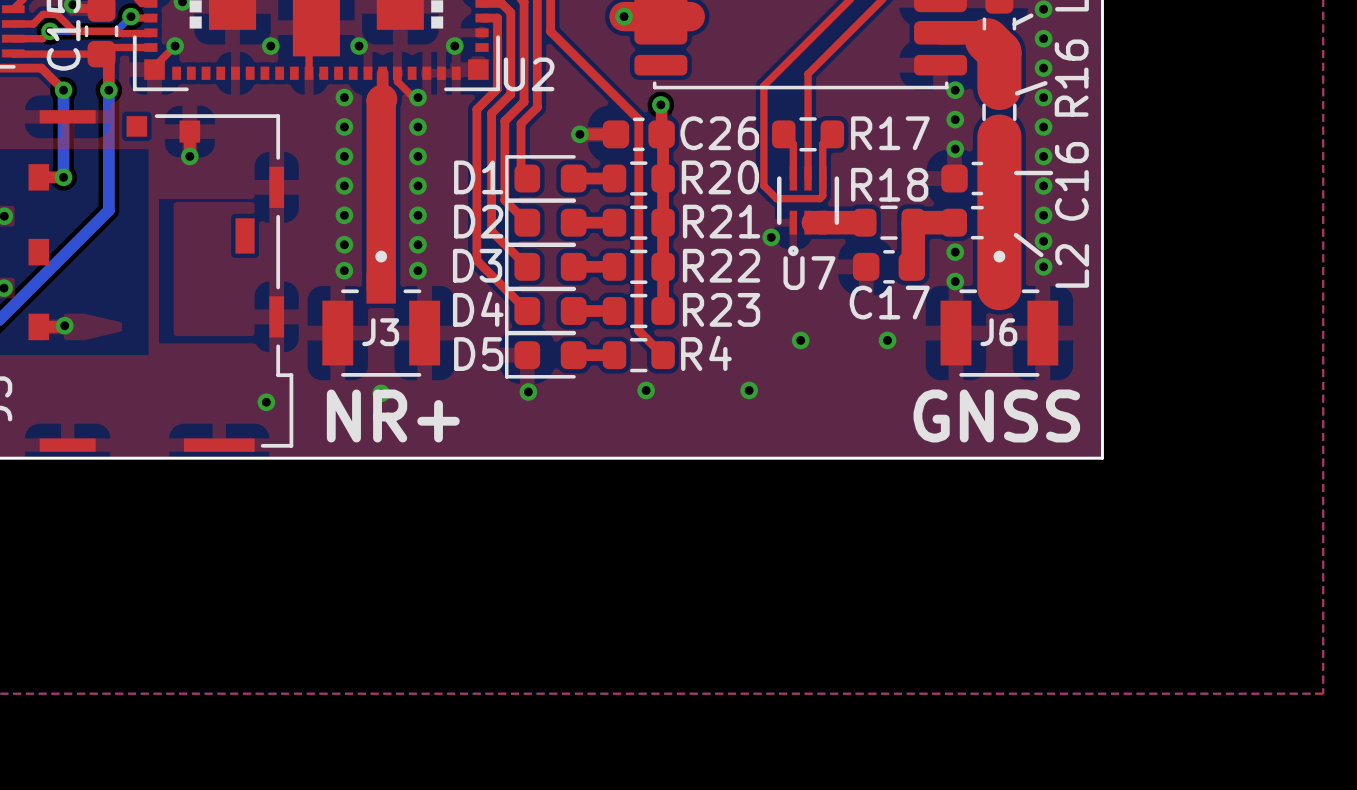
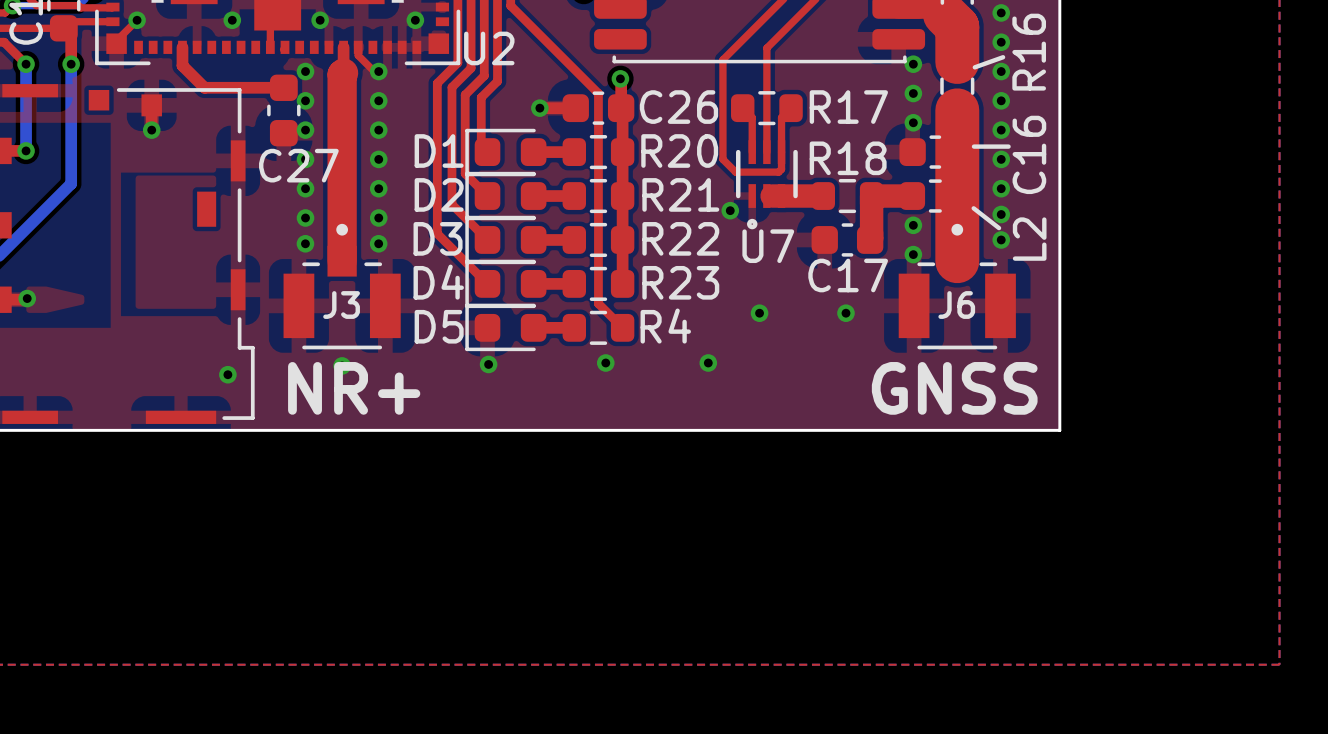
top track: none -> (182, 47) (182, 65) (204, 87) (283, 87)
C27: none -> (283, 110)

